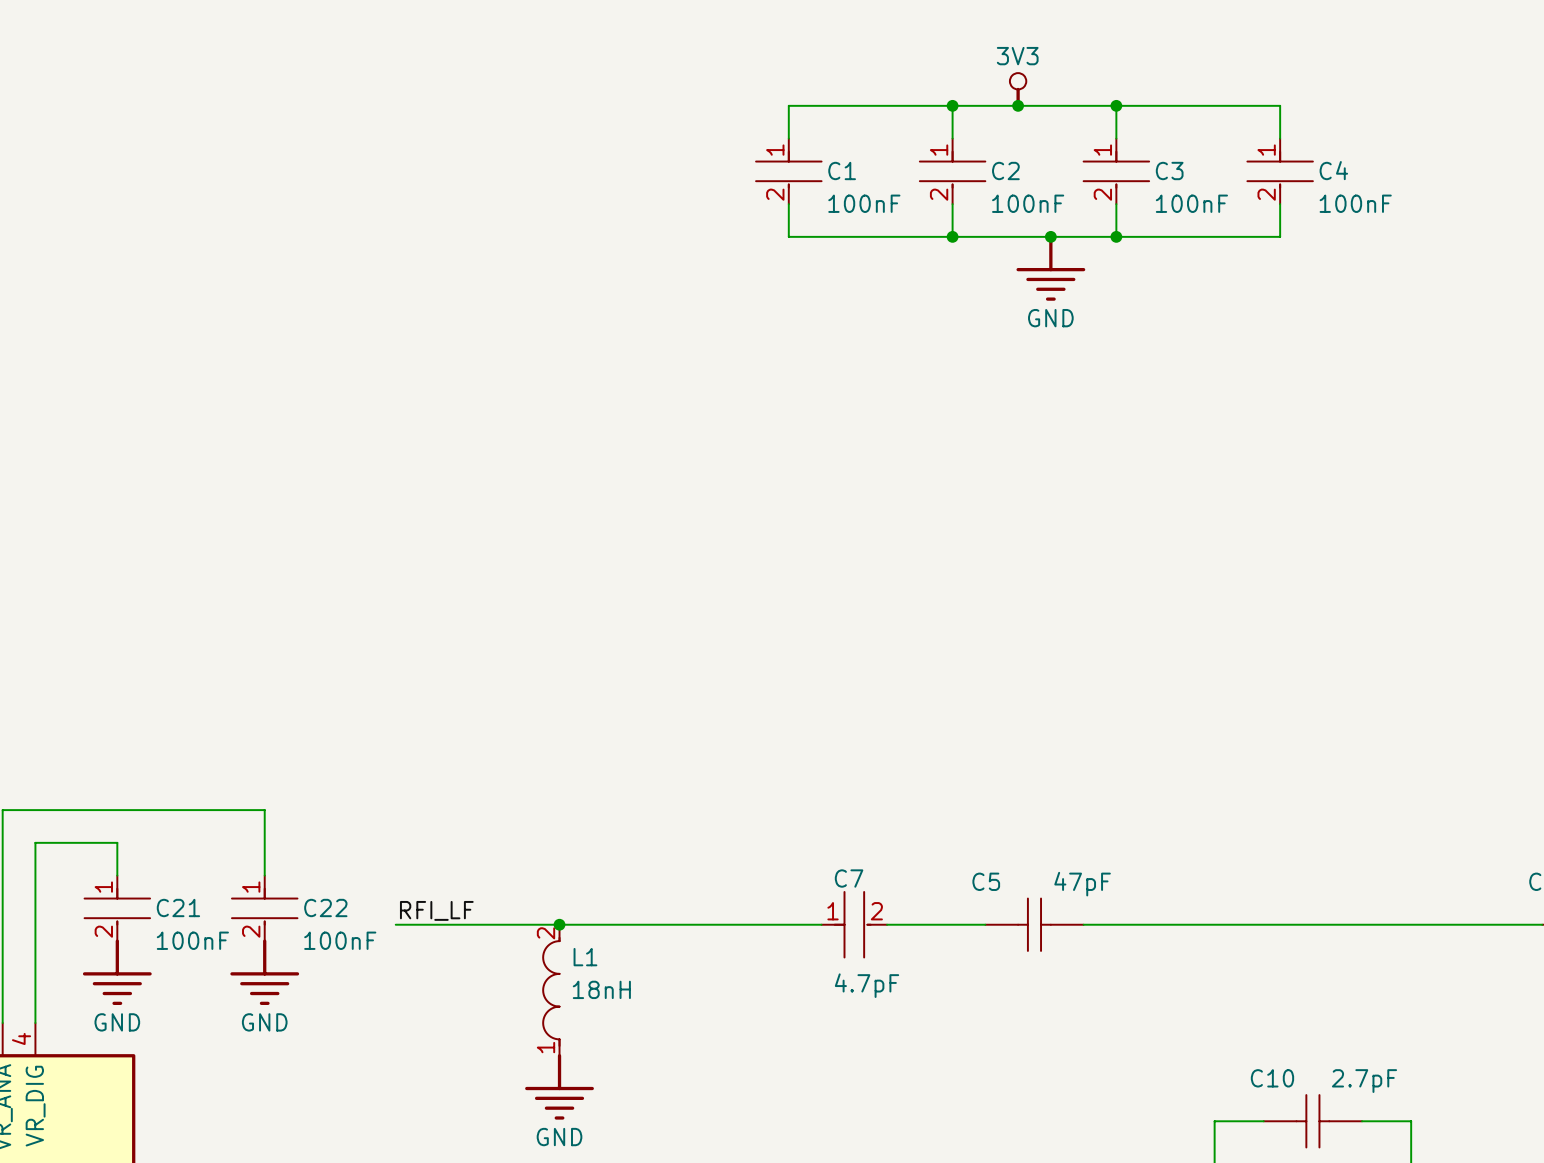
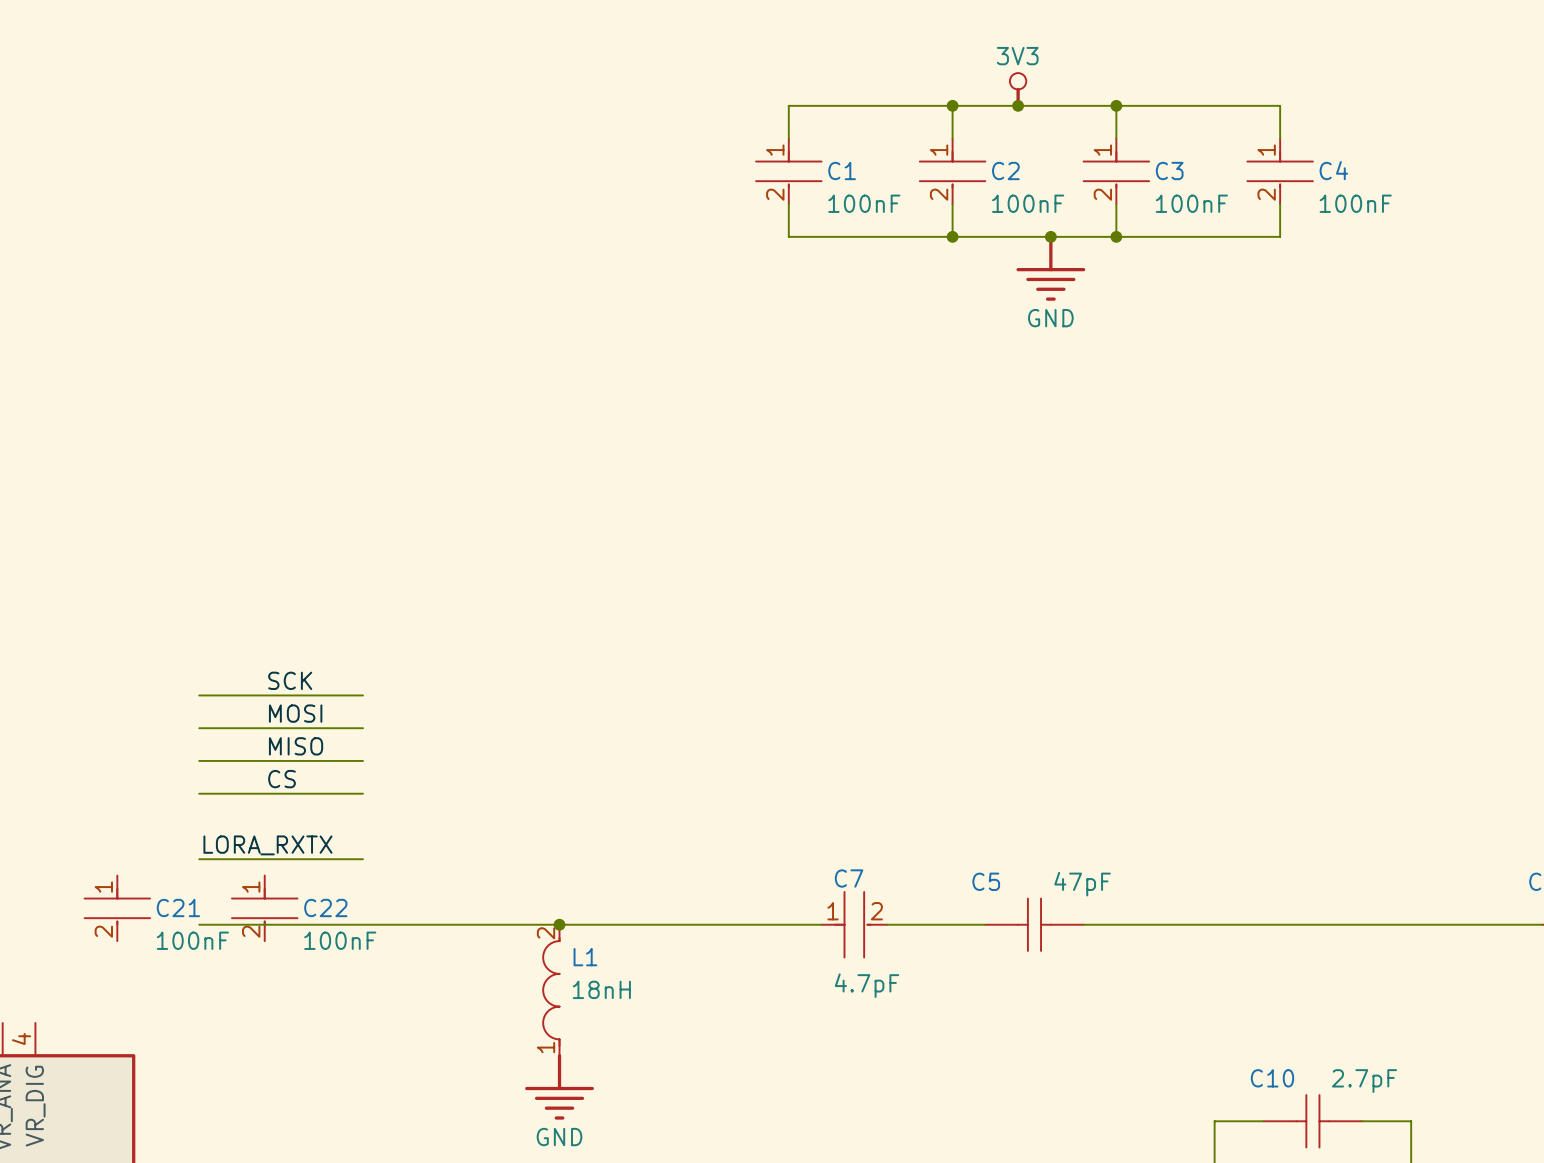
label: none -> SCK (290, 680)
wire: none -> (199, 695) (362, 695)
label: none -> MOSI (295, 713)
wire: none -> (199, 728) (362, 728)
label: none -> MISO (296, 746)
wire: none -> (199, 760) (362, 760)
label: none -> CS (282, 779)
wire: none -> (199, 793) (362, 793)
label: none -> LORA_RXTX (267, 845)
wire: none -> (199, 859) (362, 859)
wire: (117, 875) (117, 842) (35, 842) (35, 1023) -> none
wire: (264, 875) (264, 810) (2, 810) (2, 1023) -> none
label: RFI_LF (436, 910) -> none
wire: none -> (199, 924) (395, 924)
power symbol: GND (117, 972) -> none
power symbol: GND (264, 972) -> none

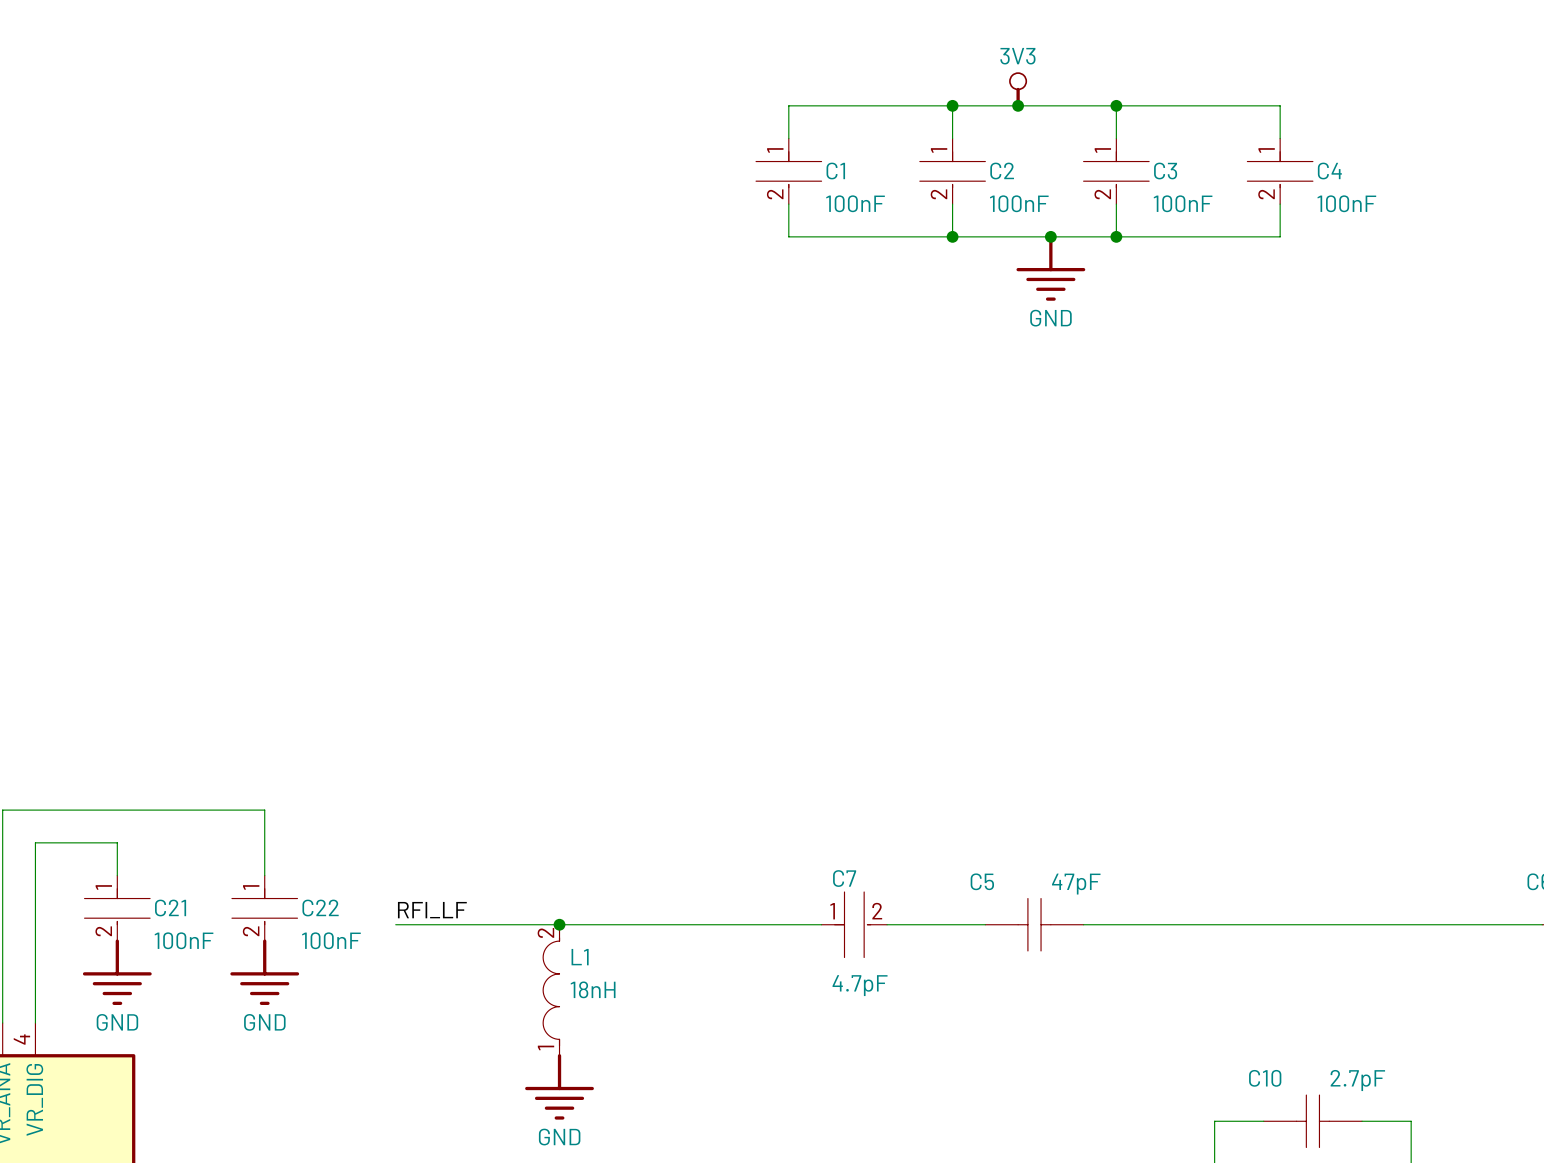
label: SCK (290, 680) -> none
wire: (199, 695) (362, 695) -> none
label: MOSI (295, 713) -> none
wire: (199, 728) (362, 728) -> none
label: MISO (296, 746) -> none
wire: (199, 760) (362, 760) -> none
label: CS (282, 779) -> none
wire: (199, 793) (362, 793) -> none
label: LORA_RXTX (267, 845) -> none
wire: (199, 859) (362, 859) -> none
wire: none -> (117, 875) (117, 842) (35, 842) (35, 1023)
wire: none -> (264, 875) (264, 810) (2, 810) (2, 1023)
label: none -> RFI_LF (432, 910)
wire: (199, 924) (395, 924) -> none
power symbol: none -> GND (117, 972)
power symbol: none -> GND (264, 972)

